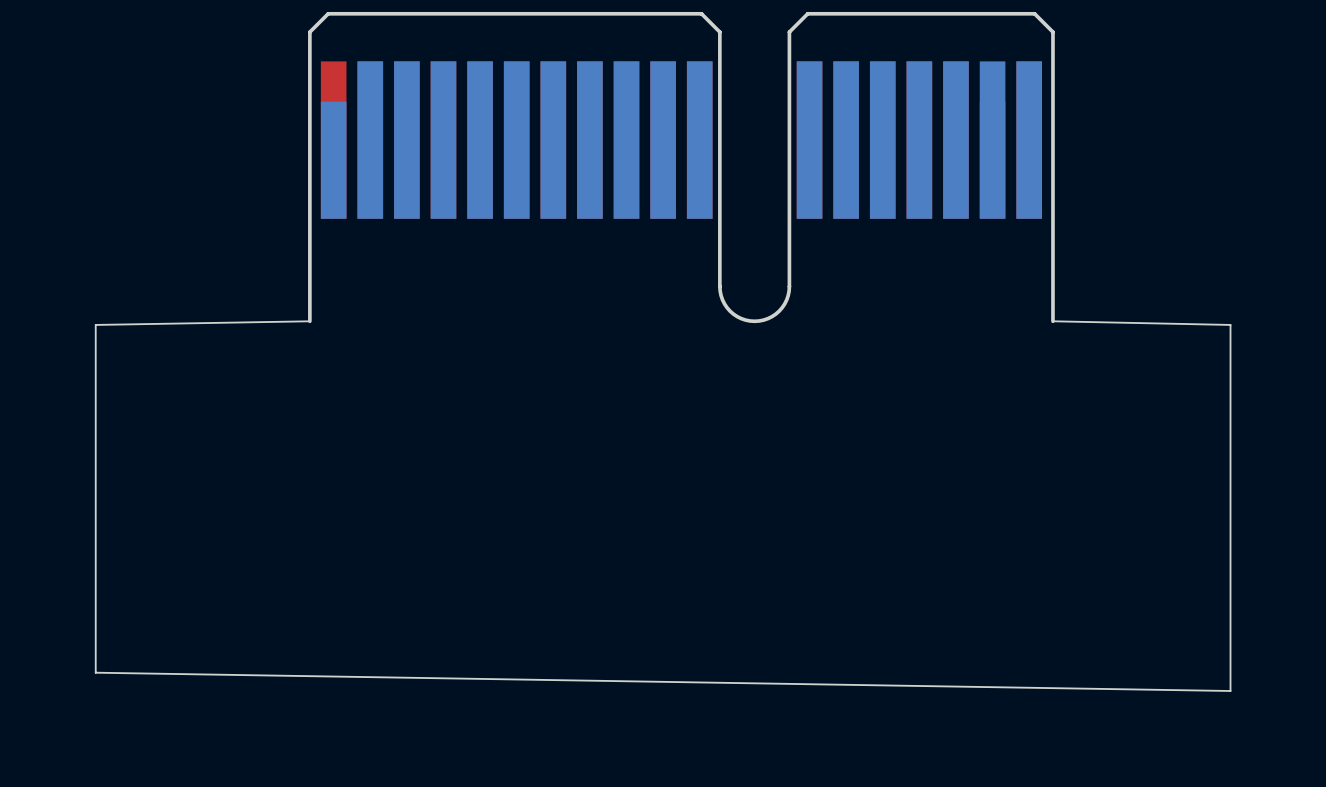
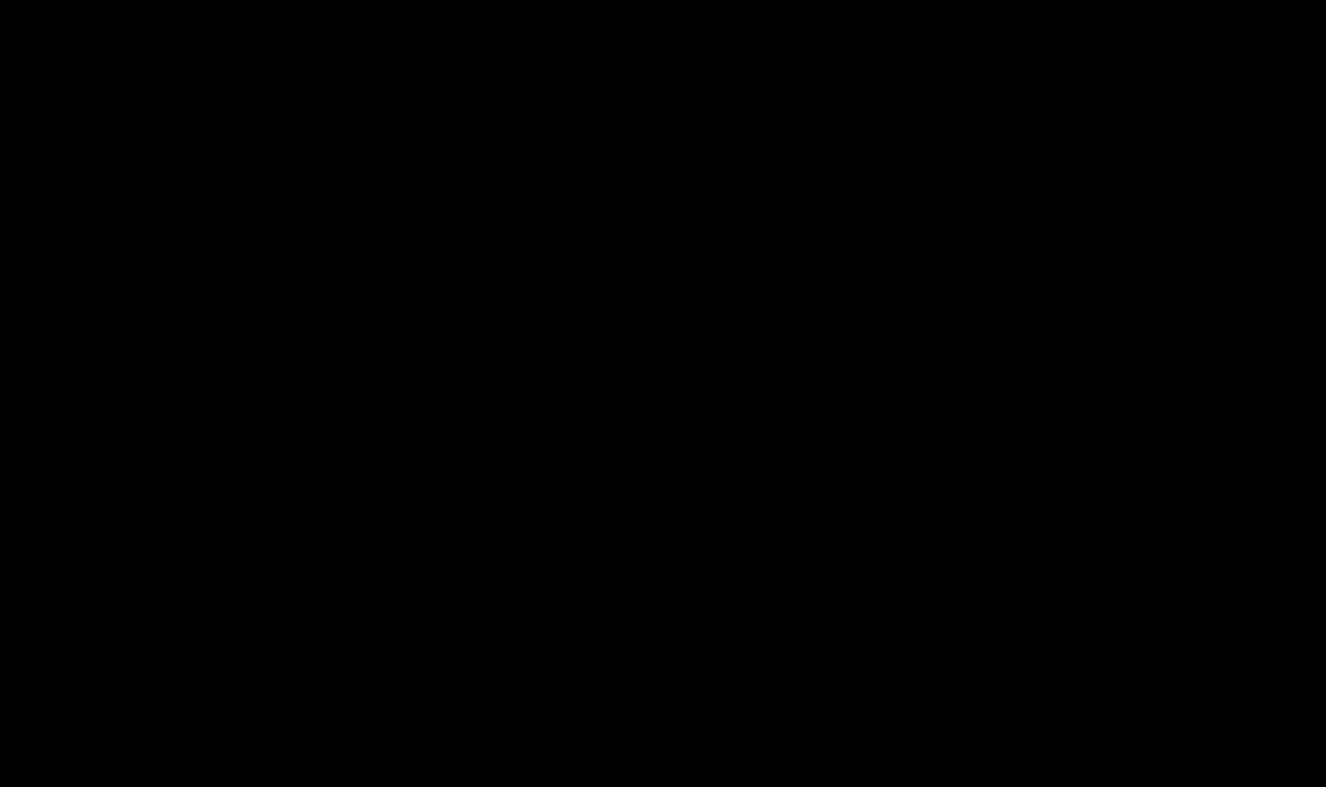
part: (681, 167) -> none
board edge: (1052, 321) (1230, 324) (1230, 691) (95, 672) (95, 324) (309, 321) -> none

